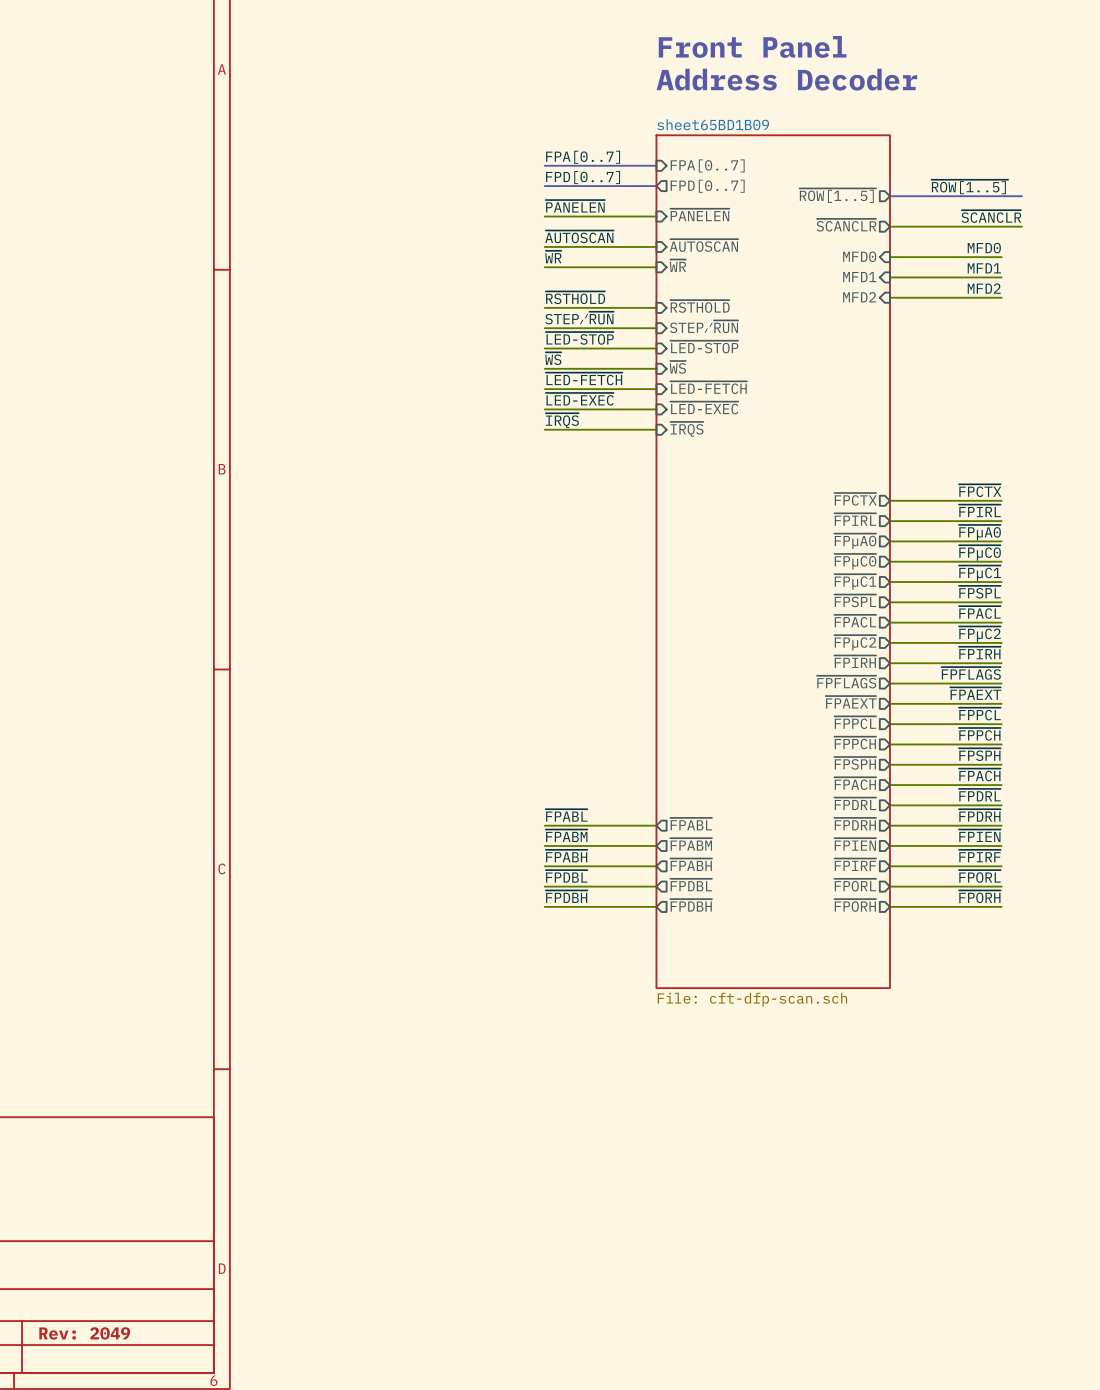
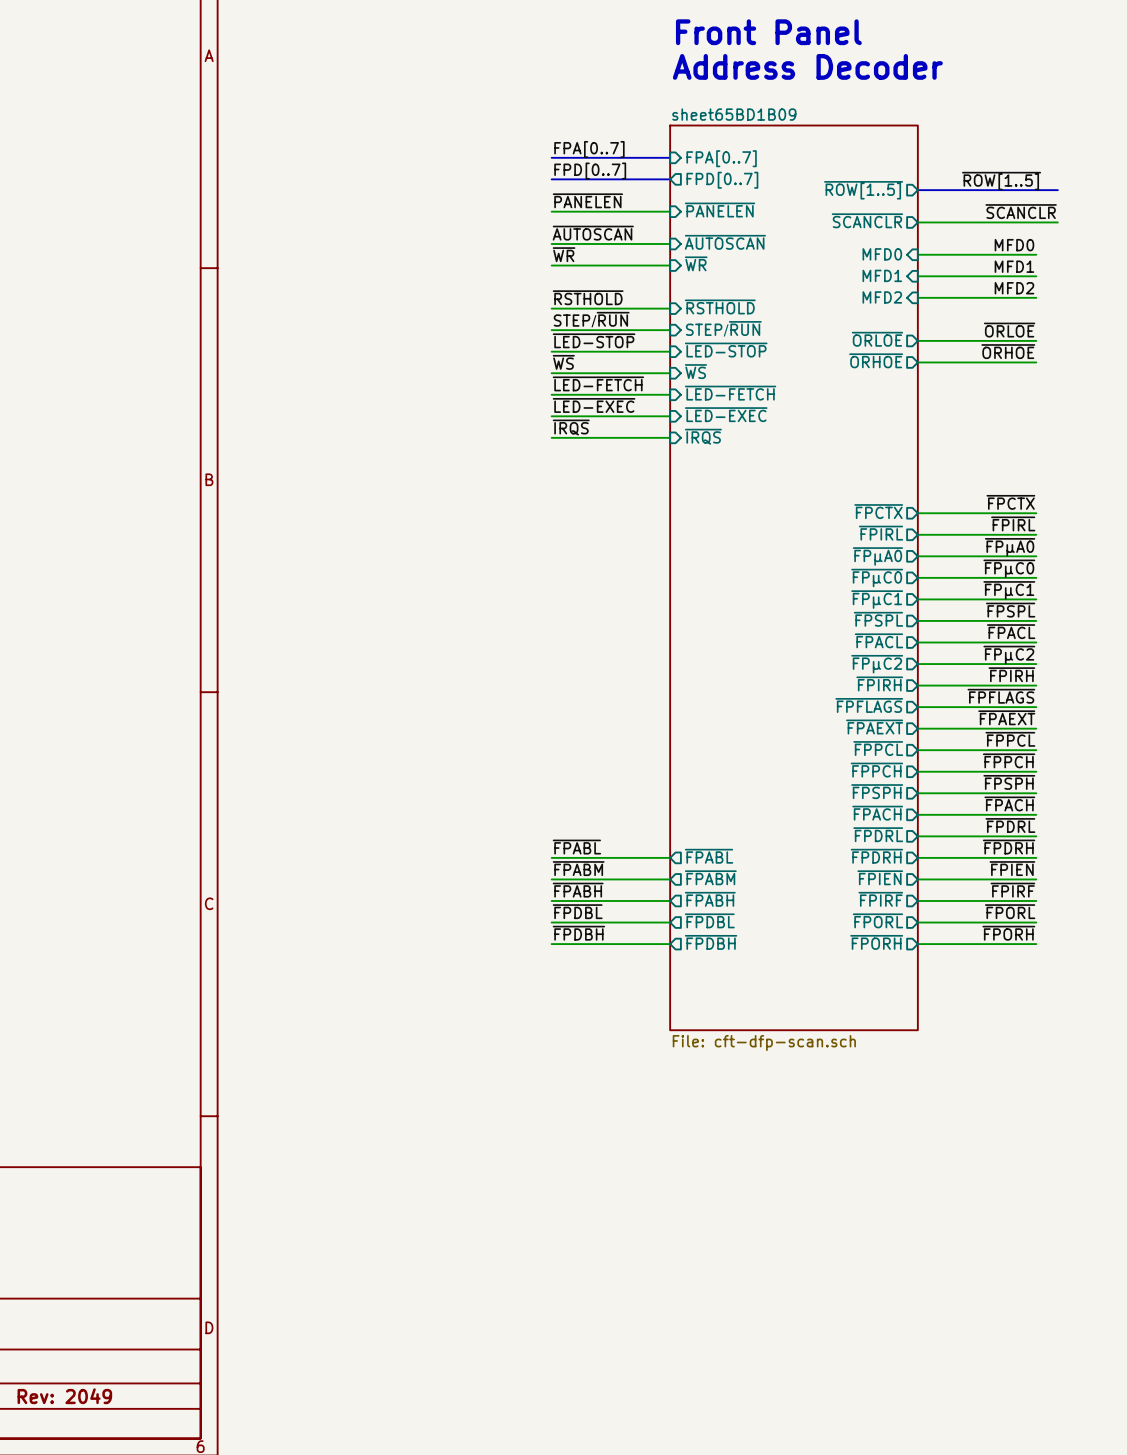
label: none -> ~{ORLOE} (1009, 330)
sheet pin: none -> ~{ORLOE} (877, 339)
wire: none -> (917, 340) (1036, 340)
label: none -> ~{ORHOE} (1008, 351)
sheet pin: none -> ~{ORHOE} (876, 360)
wire: none -> (917, 362) (1036, 362)

